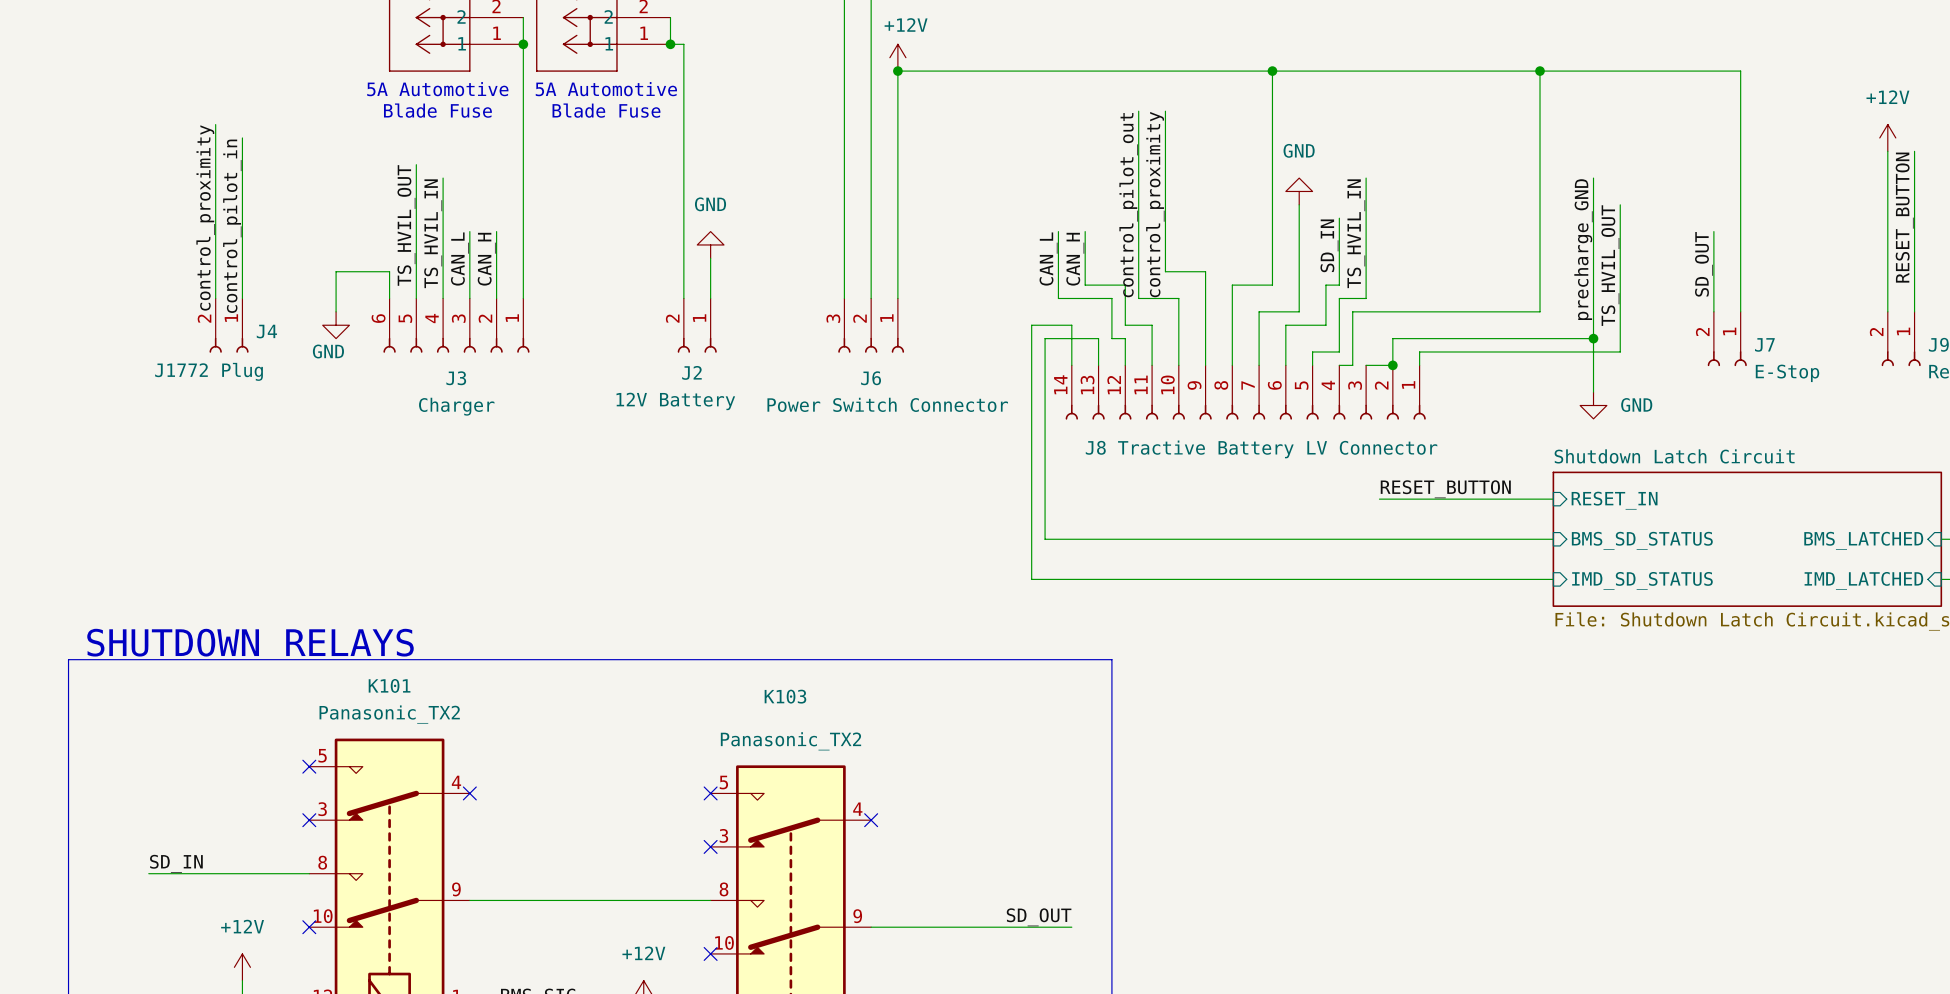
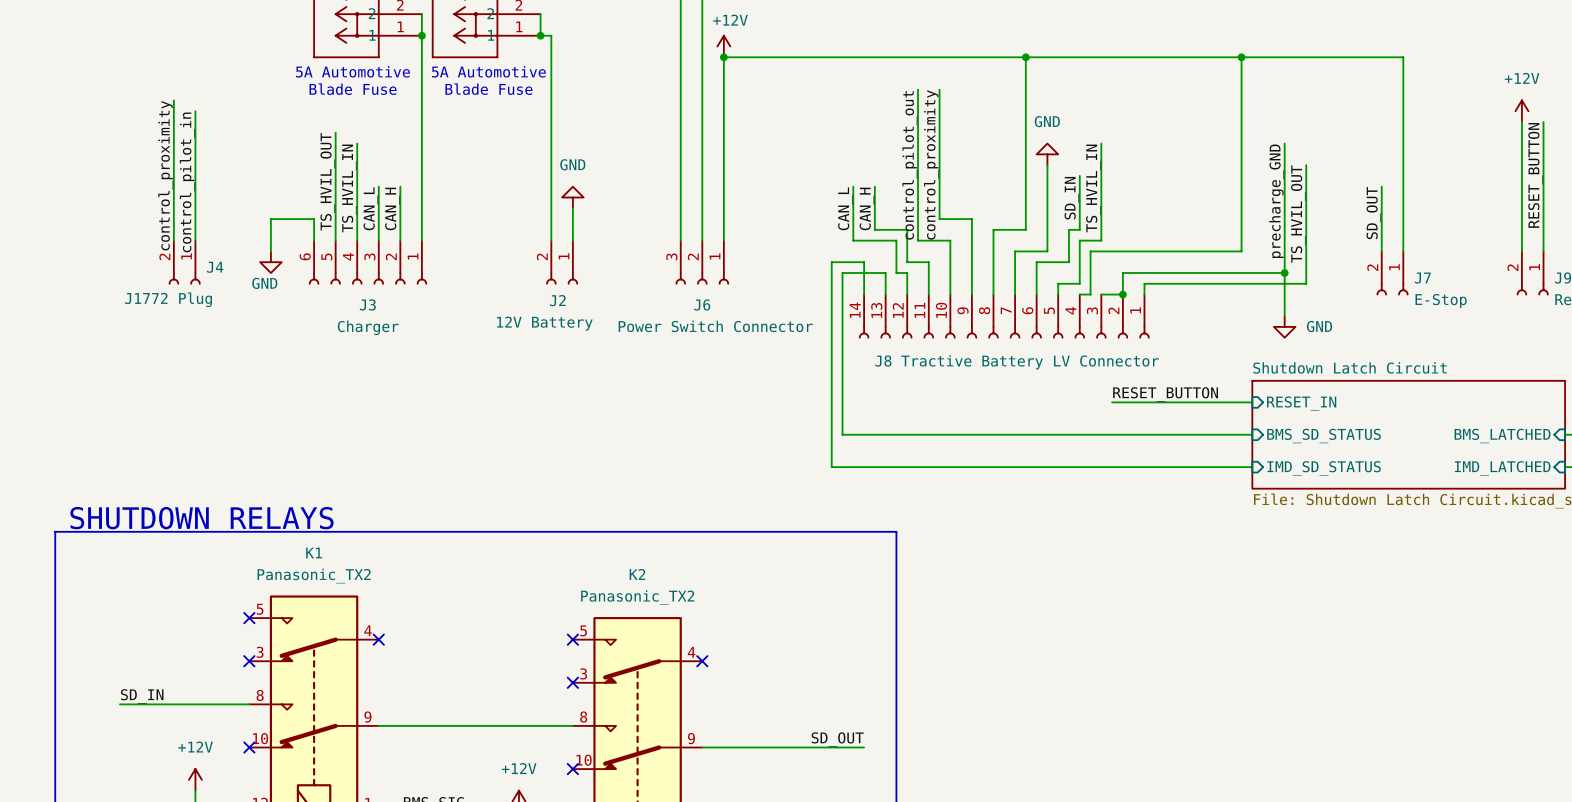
K101 name: K101 (389, 685) -> K1 (314, 552)
K103 name: K103 (785, 696) -> K2 (637, 574)

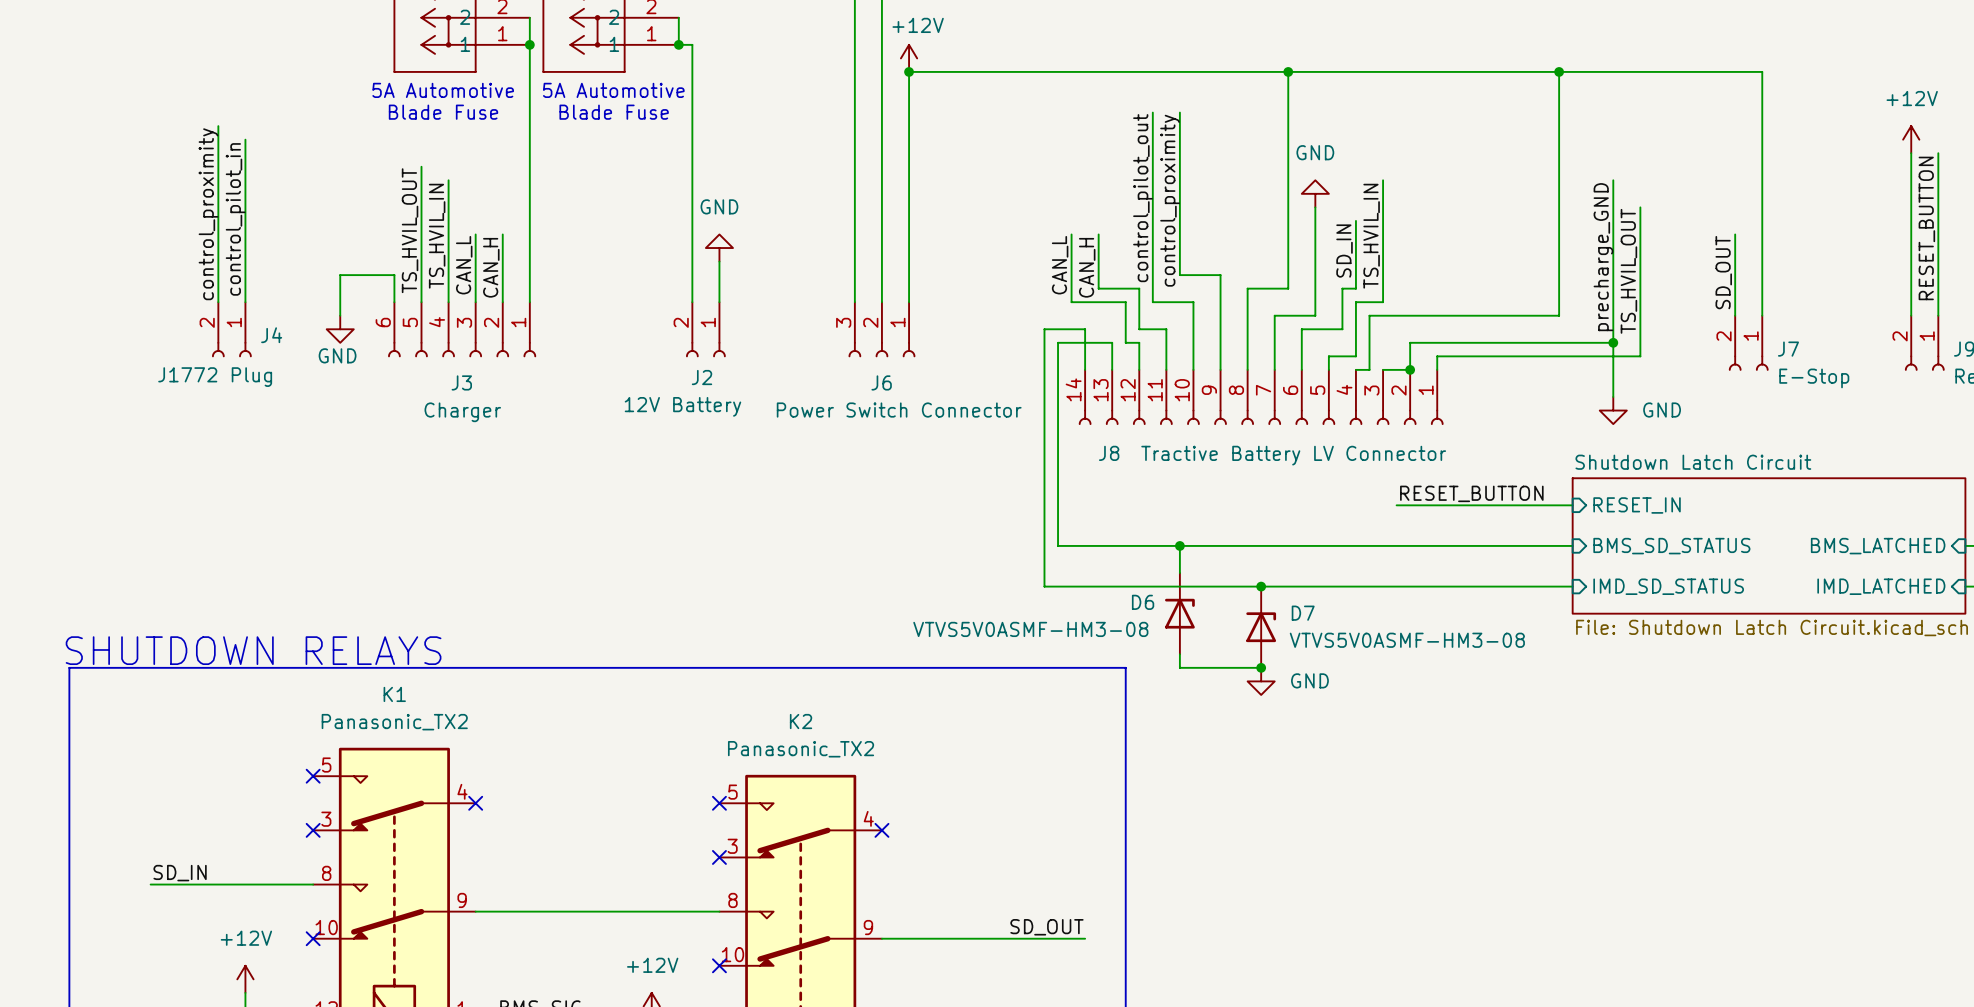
wire: none -> (1179, 545) (1179, 573)
junction: none -> (1179, 545)
junction: none -> (1261, 586)
D6: none -> VTVS5V0ASMF-HM3-08 (1179, 613)
D7: none -> VTVS5V0ASMF-HM3-08 (1261, 627)
wire: none -> (1179, 654) (1179, 667) (1261, 667)
junction: none -> (1261, 667)
power symbol: none -> GND (1261, 681)

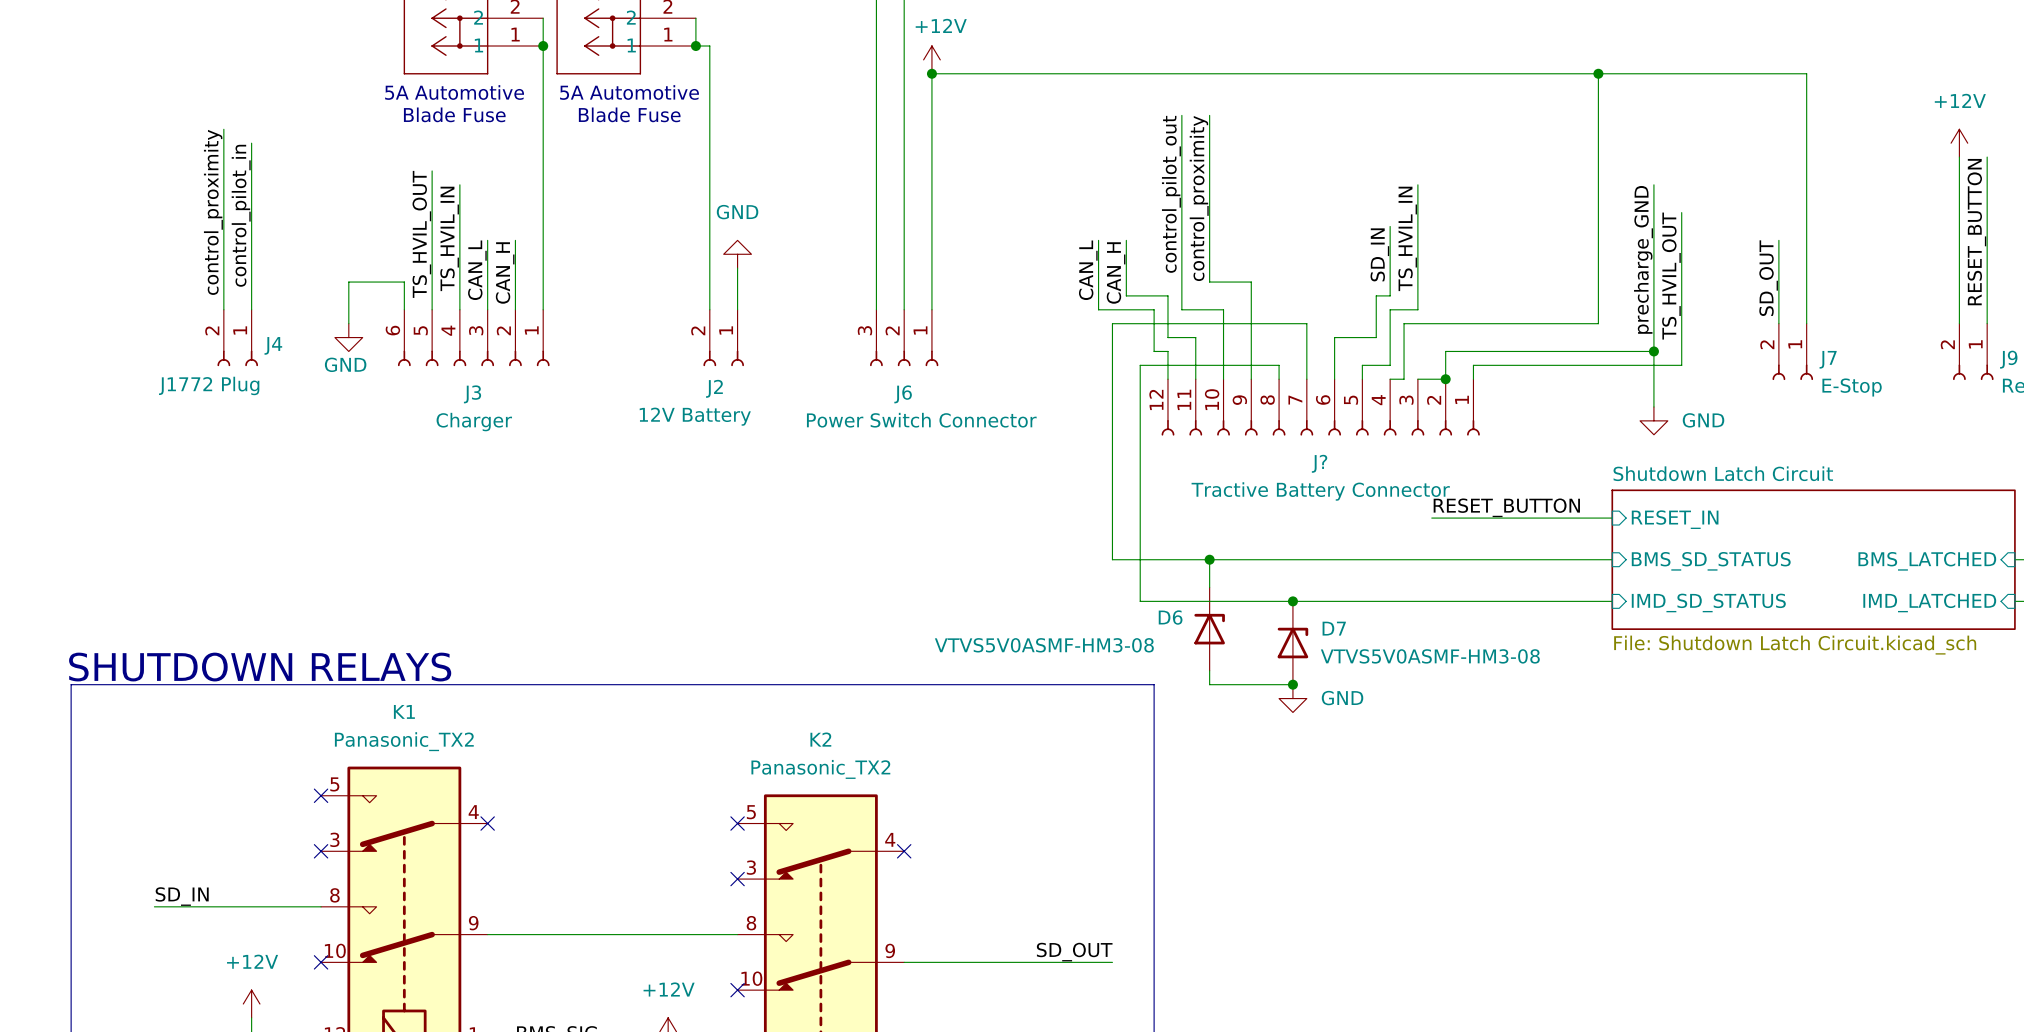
wire: (1288, 71) (1288, 288) (1247, 288) (1247, 356) -> (1140, 365) (1279, 365)
junction: (1288, 71) -> none
power symbol: GND (1315, 193) -> none
wire: (1315, 207) (1315, 315) (1274, 315) -> (1112, 337) (1112, 323) (1306, 323)
wire: (1085, 329) (1044, 329) (1044, 586) (1112, 586) -> (1140, 379) (1140, 601)
wire: (1112, 356) (1112, 342) (1058, 342) (1058, 545) (1085, 545) -> (1112, 379) (1112, 559)
J8: Tractive Battery LV Connector (1261, 397) -> none
J?: none -> Tractive Battery Connector (1320, 407)

